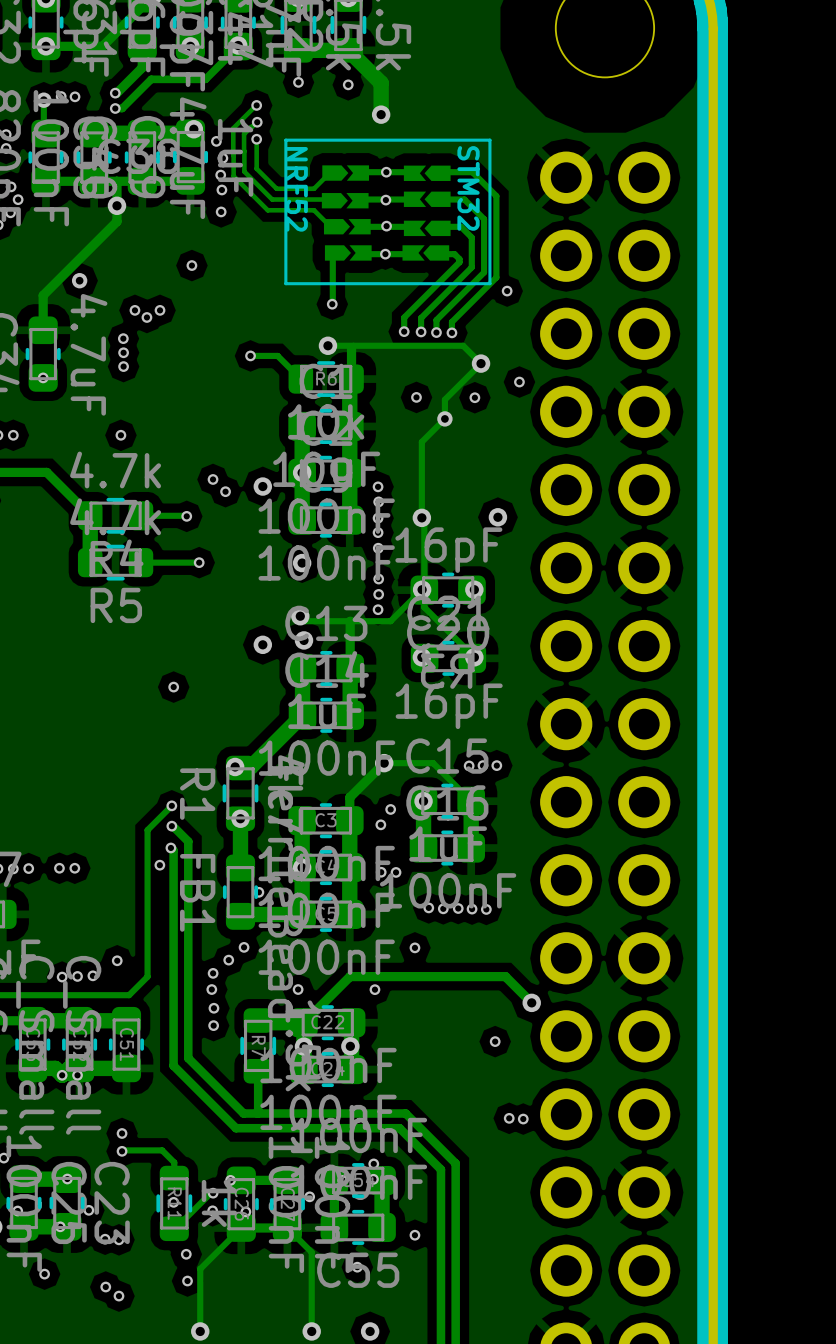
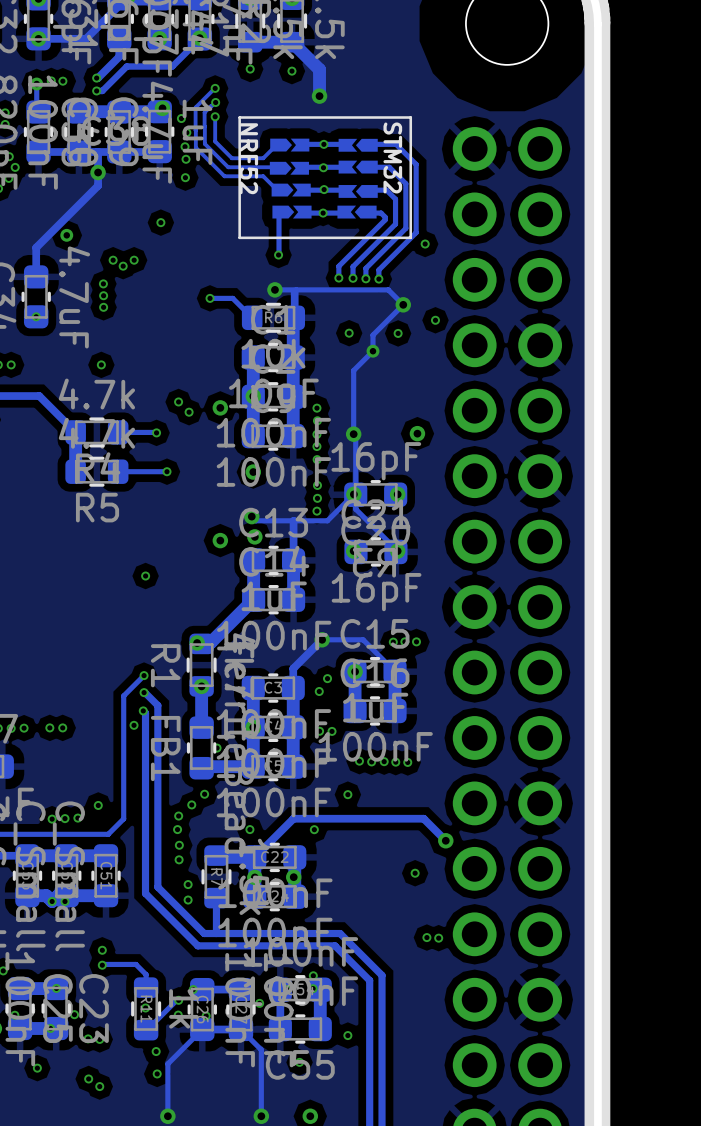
via: none -> (188, 884)
via: none -> (188, 900)

